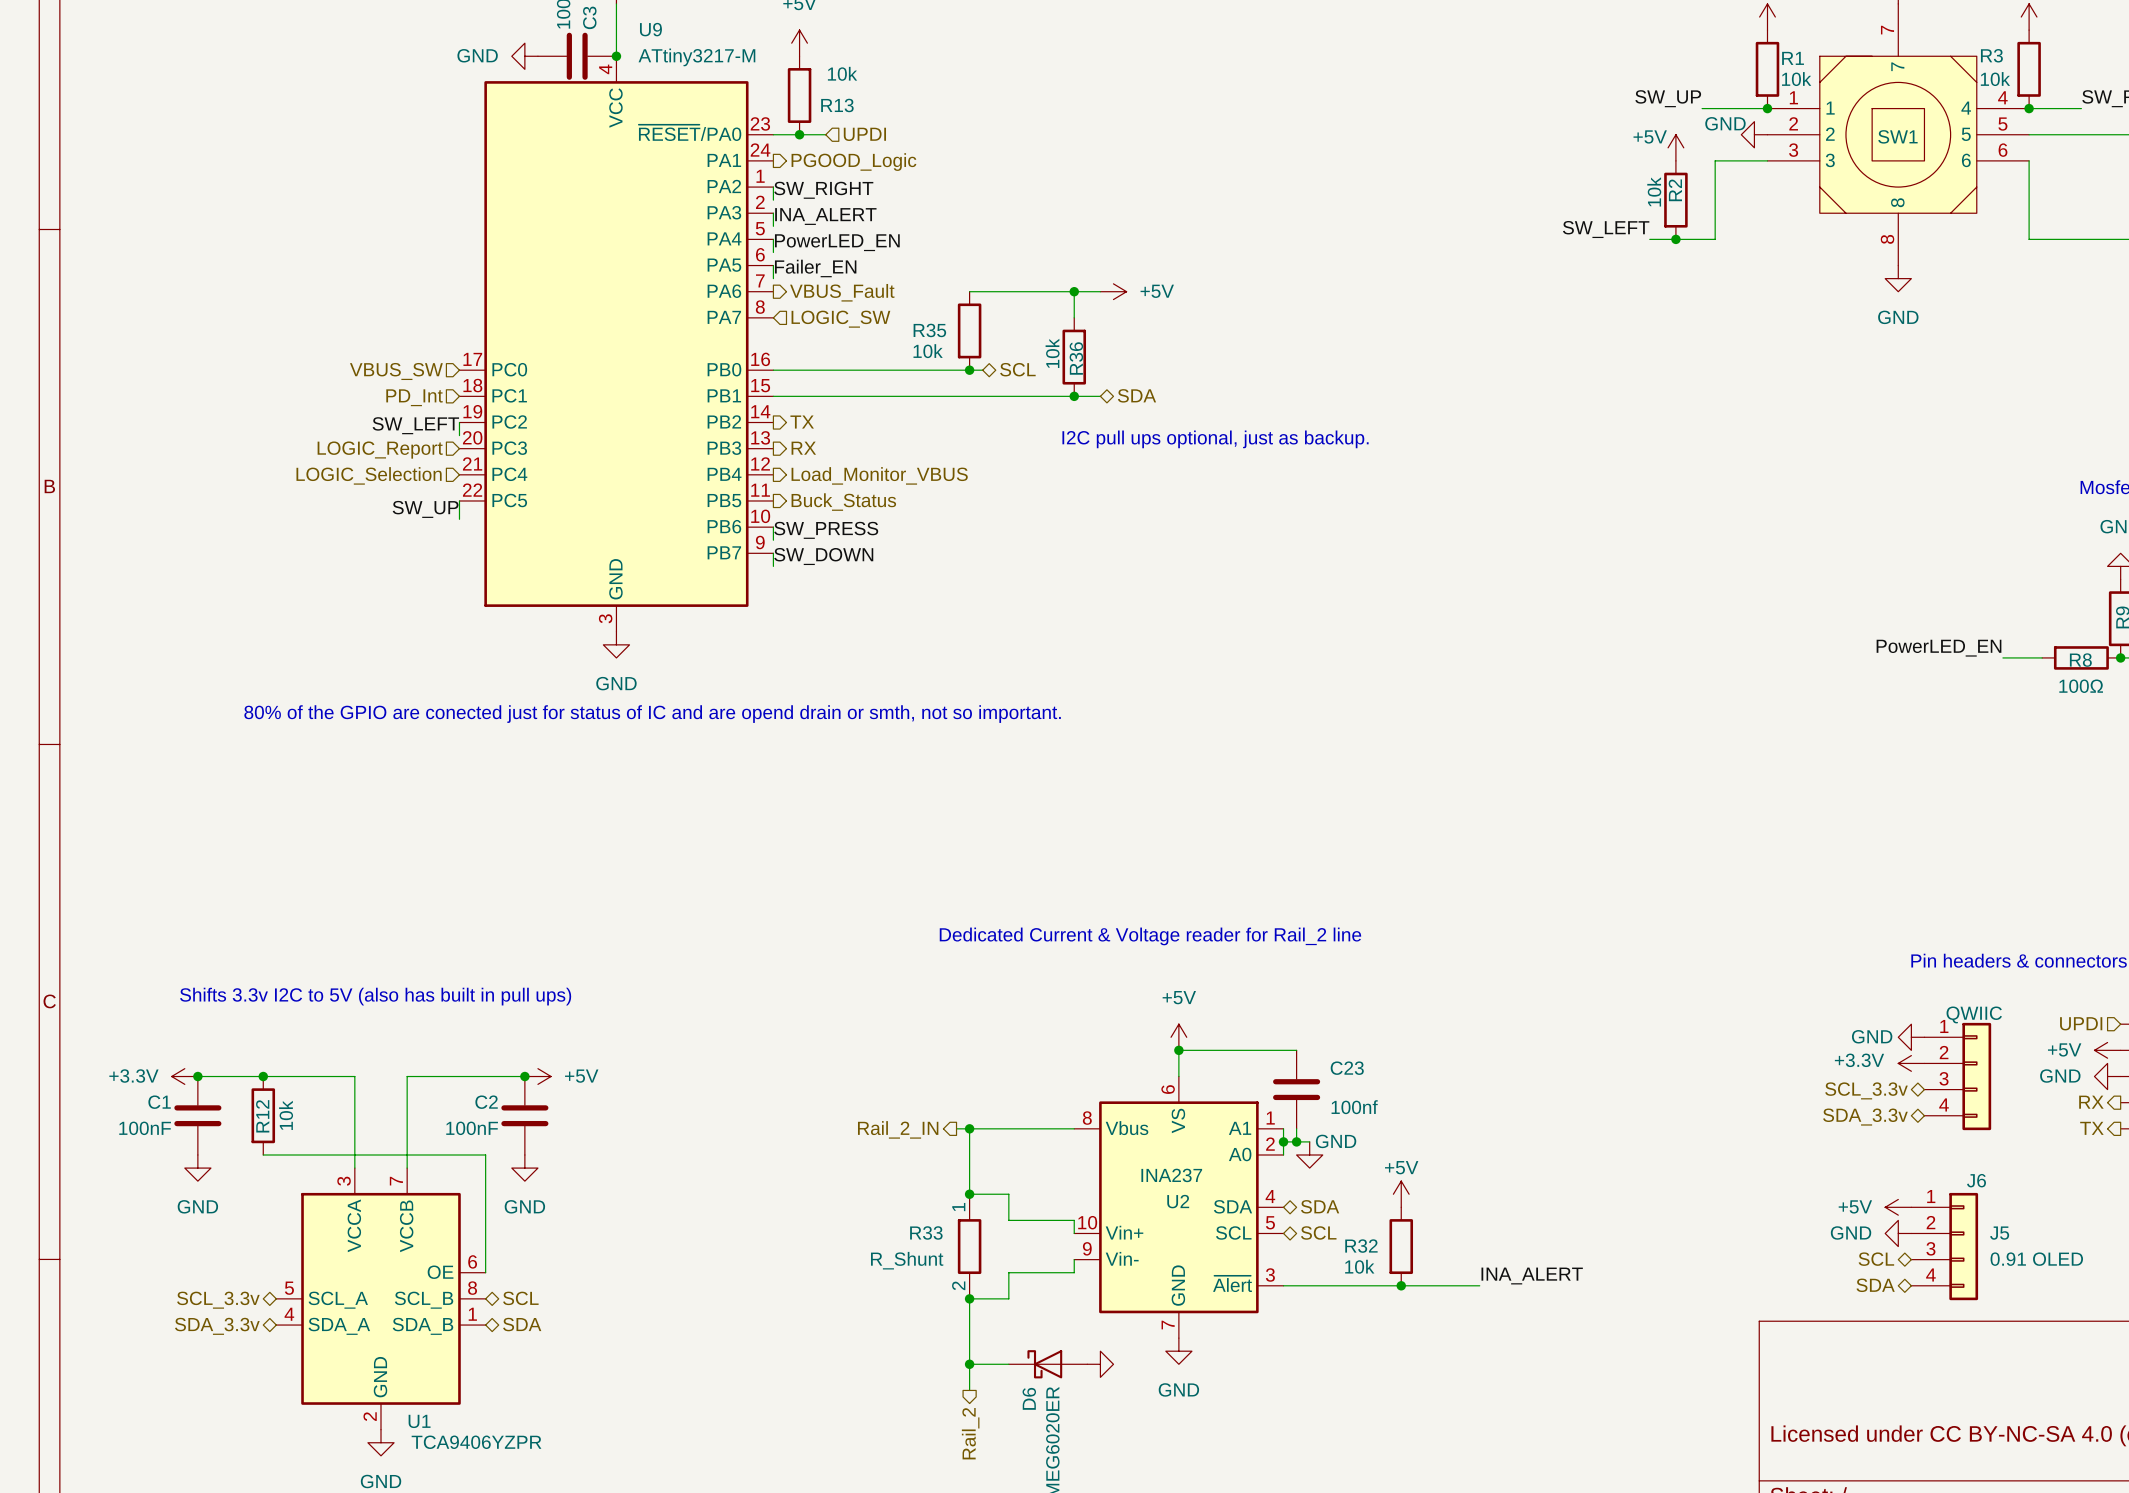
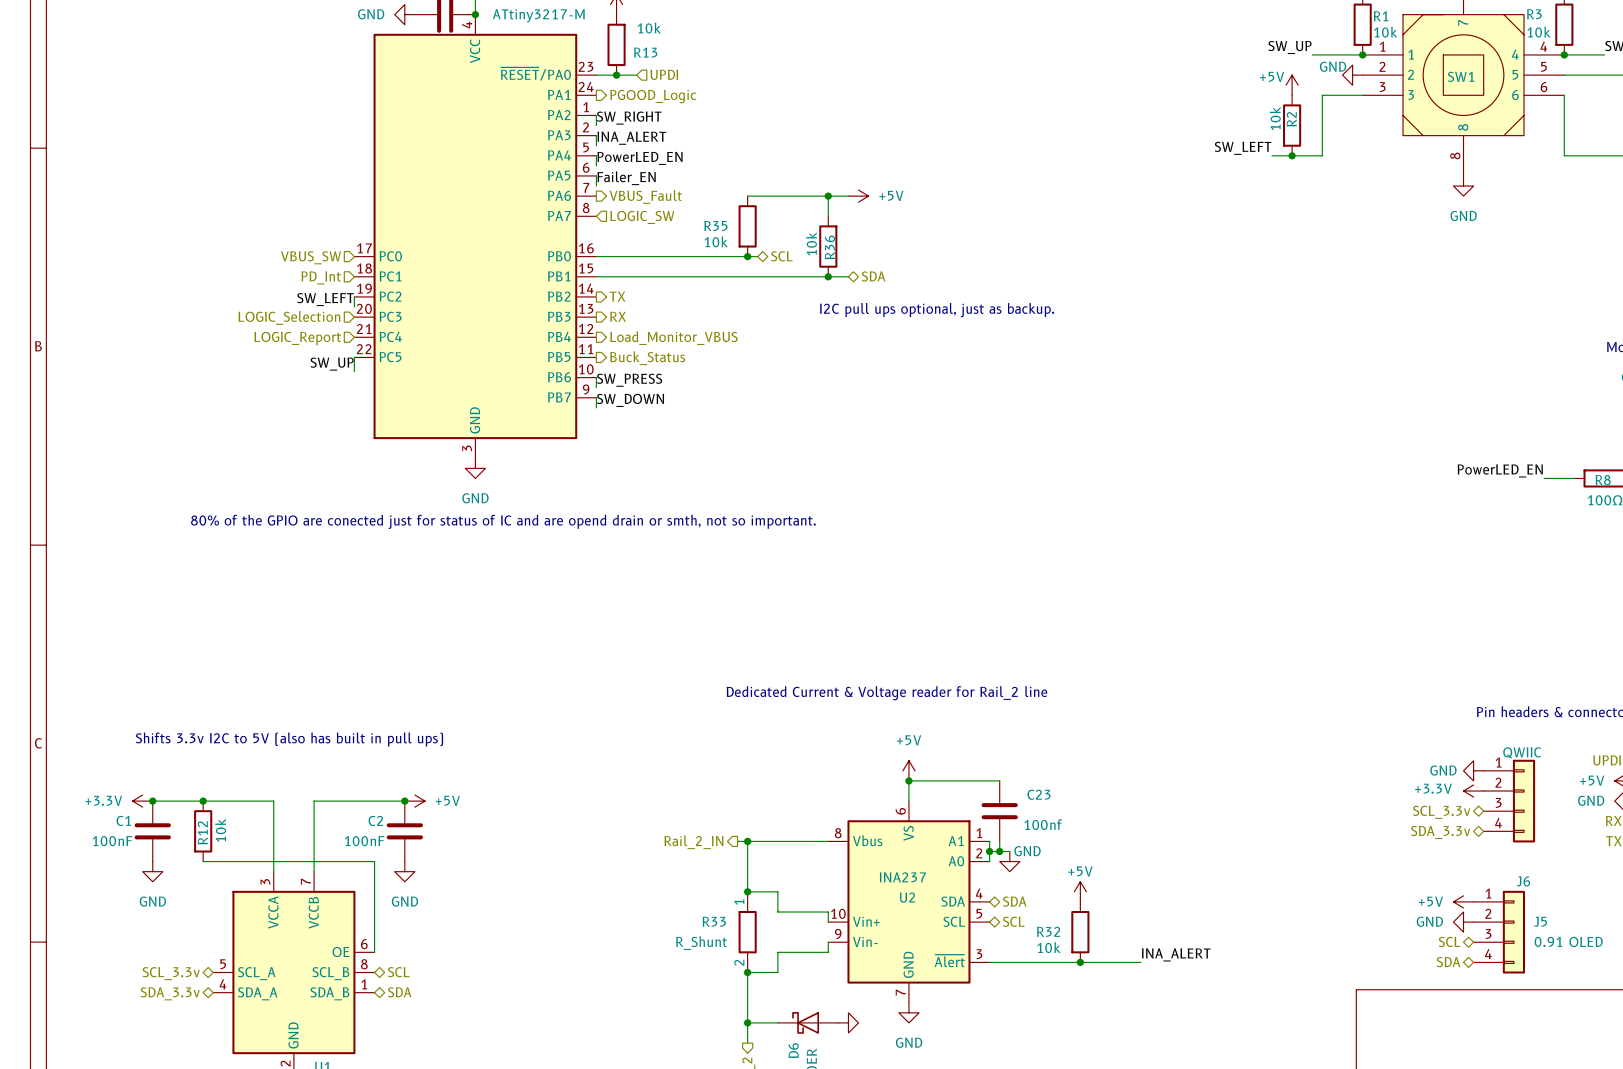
hierarchical label: LOGIC_Report (380, 450) -> LOGIC_Selection (289, 317)
hierarchical label: LOGIC_Selection (369, 475) -> LOGIC_Report (297, 338)

